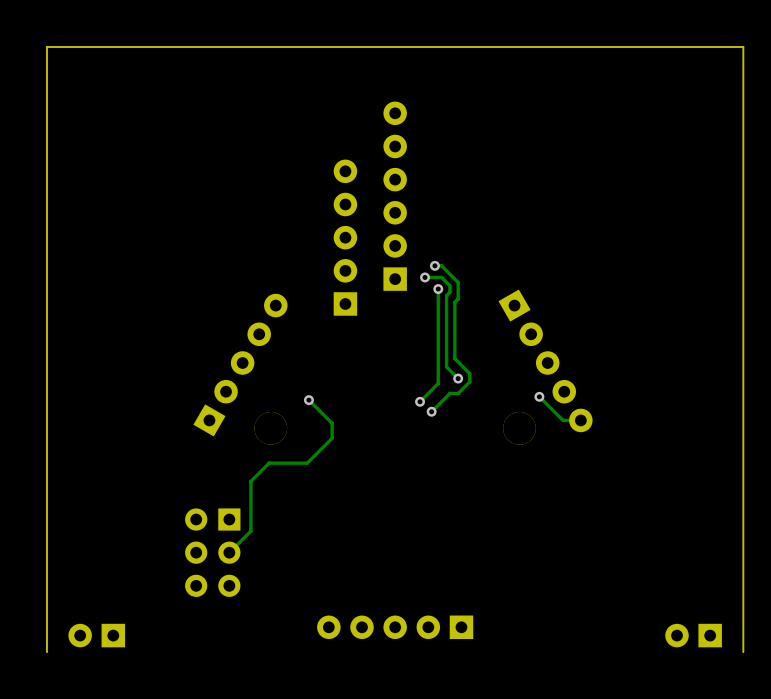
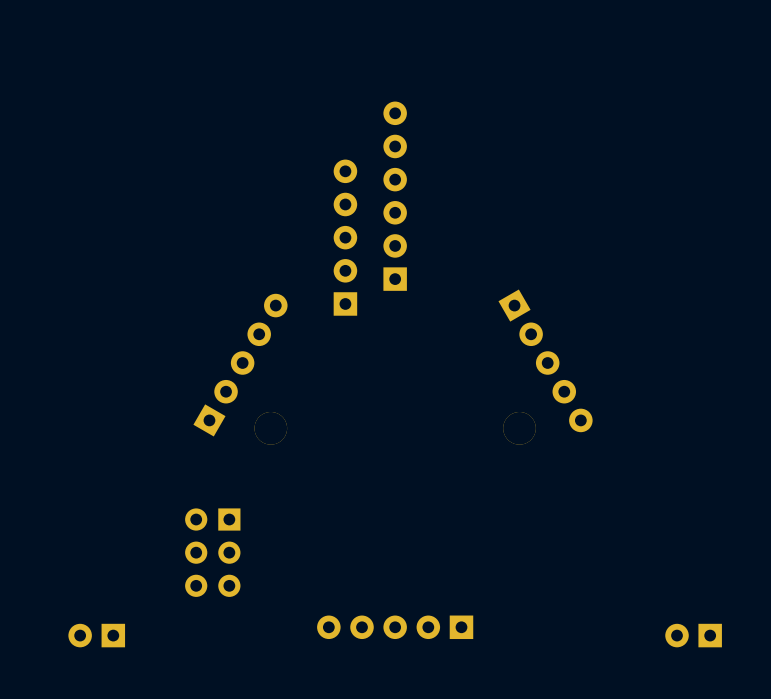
track: (434, 265) (441, 265) (458, 282) (458, 299) (454, 302) (454, 358) (469, 373) (469, 381) (458, 393) (449, 393) (431, 411) -> none
via: (434, 265) -> none
track: (425, 277) (441, 277) (449, 285) (449, 292) (446, 295) (446, 366) (458, 378) -> none
via: (425, 277) -> none
track: (438, 289) (438, 383) (420, 401) -> none
via: (438, 289) -> none
via: (458, 378) -> none
track: (539, 396) (563, 420) (580, 420) -> none
via: (539, 396) -> none
track: (308, 400) (332, 423) (332, 438) (307, 463) (269, 463) (250, 481) (250, 531) (229, 552) -> none
via: (308, 400) -> none
via: (420, 401) -> none
via: (431, 411) -> none
board edge: (743, 652) (743, 46) (46, 46) (46, 652) -> none

